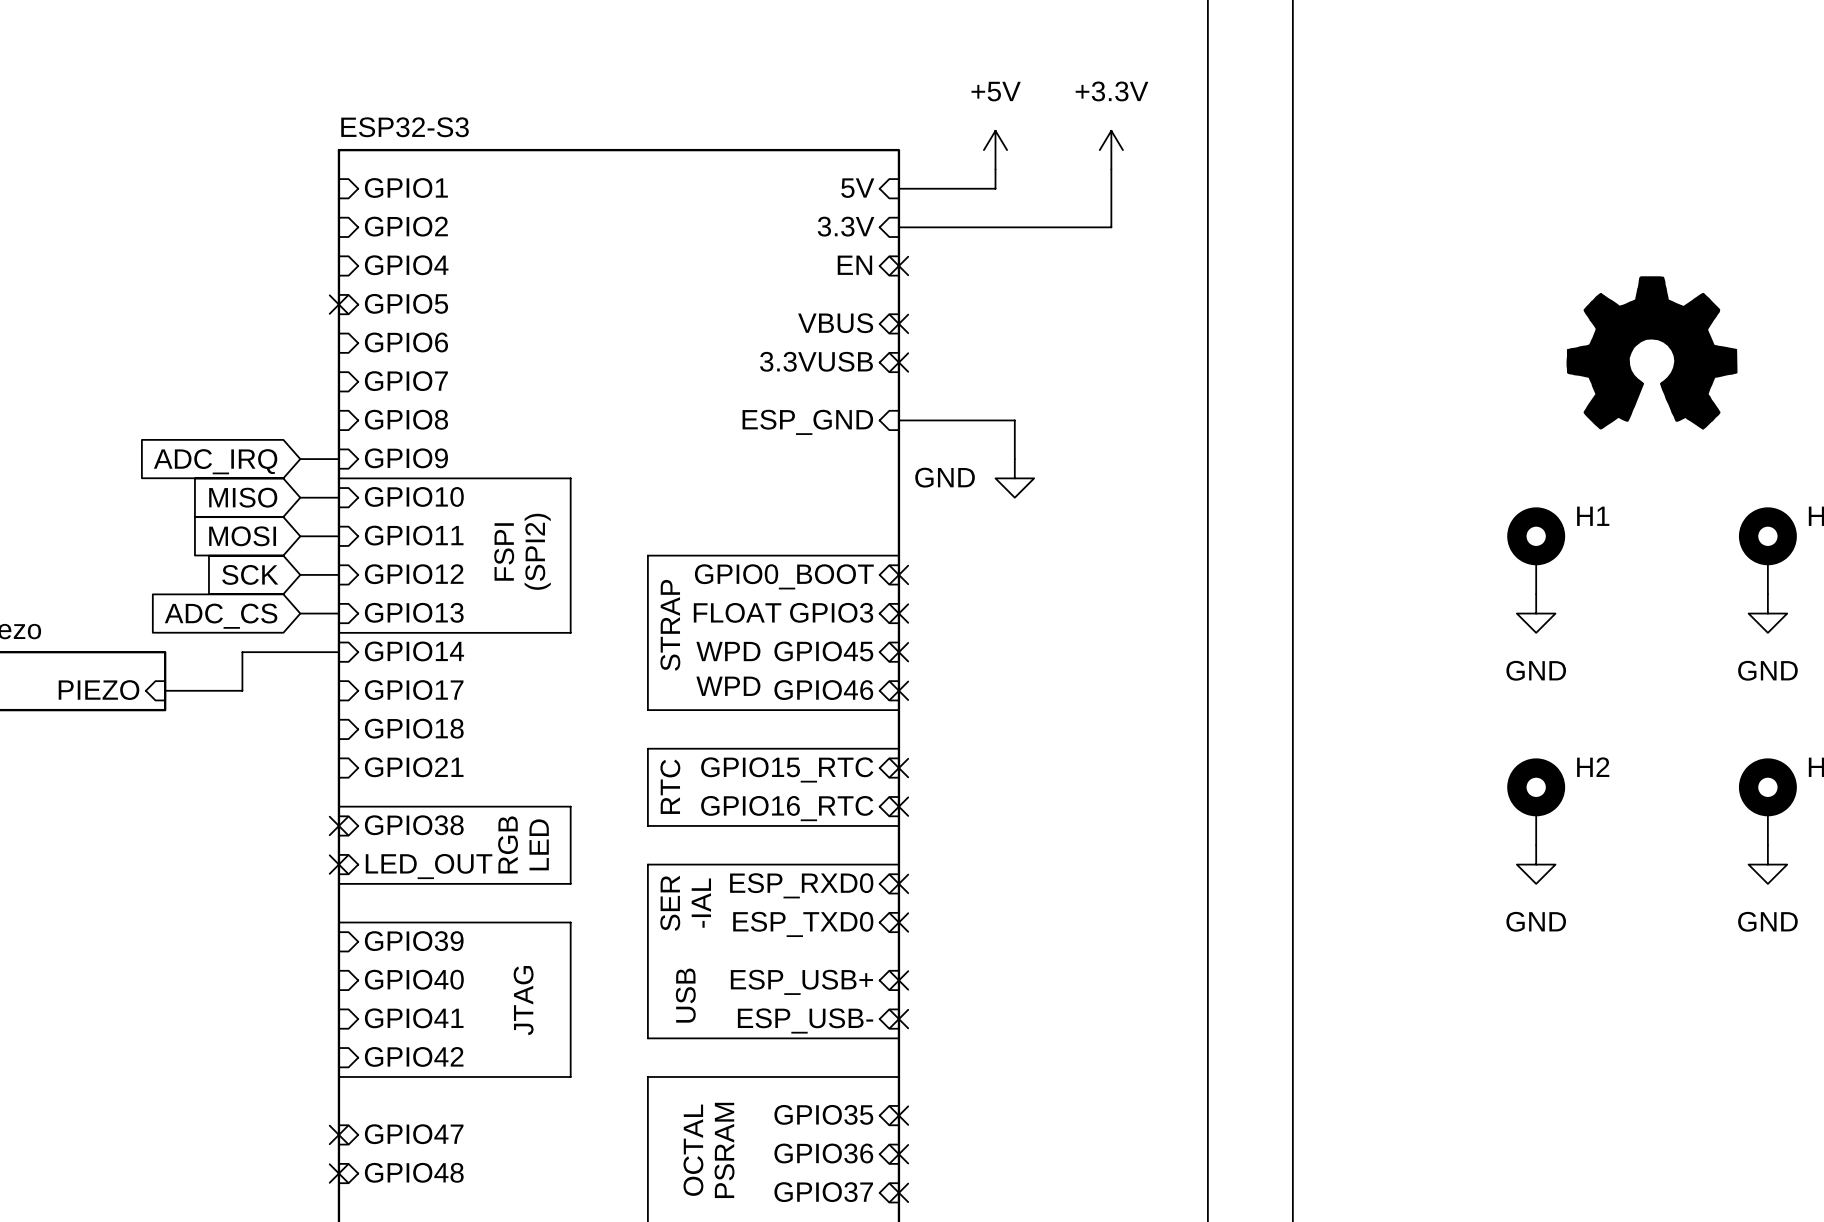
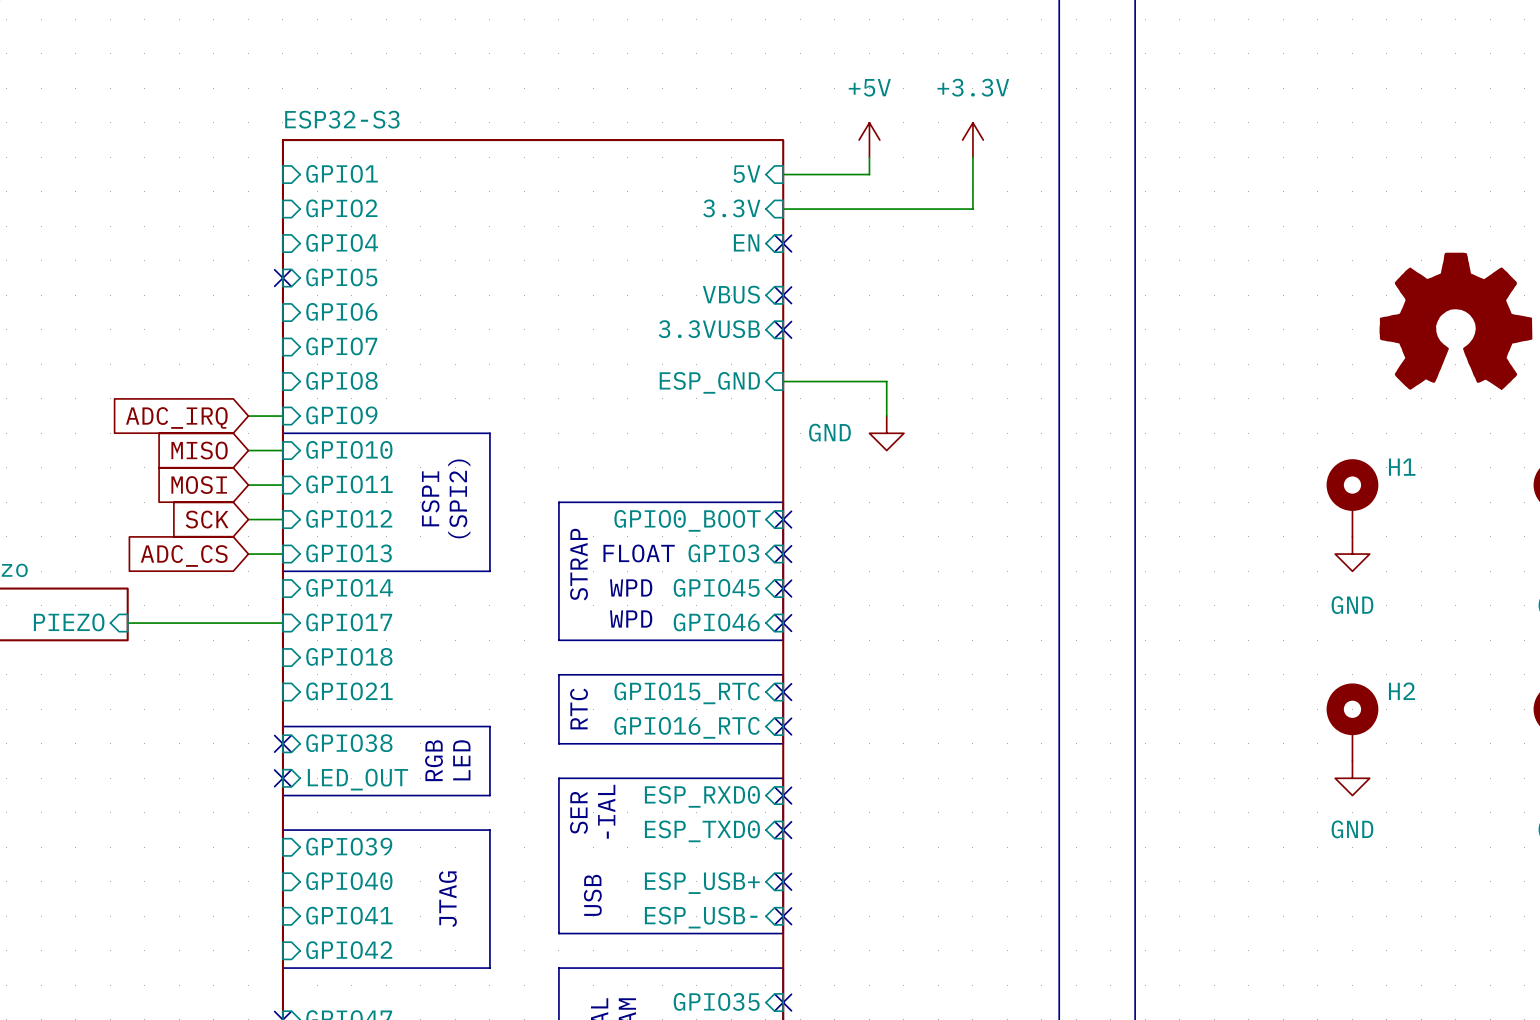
wire: (338, 652) (242, 652) (242, 690) -> (282, 623) (196, 623)

